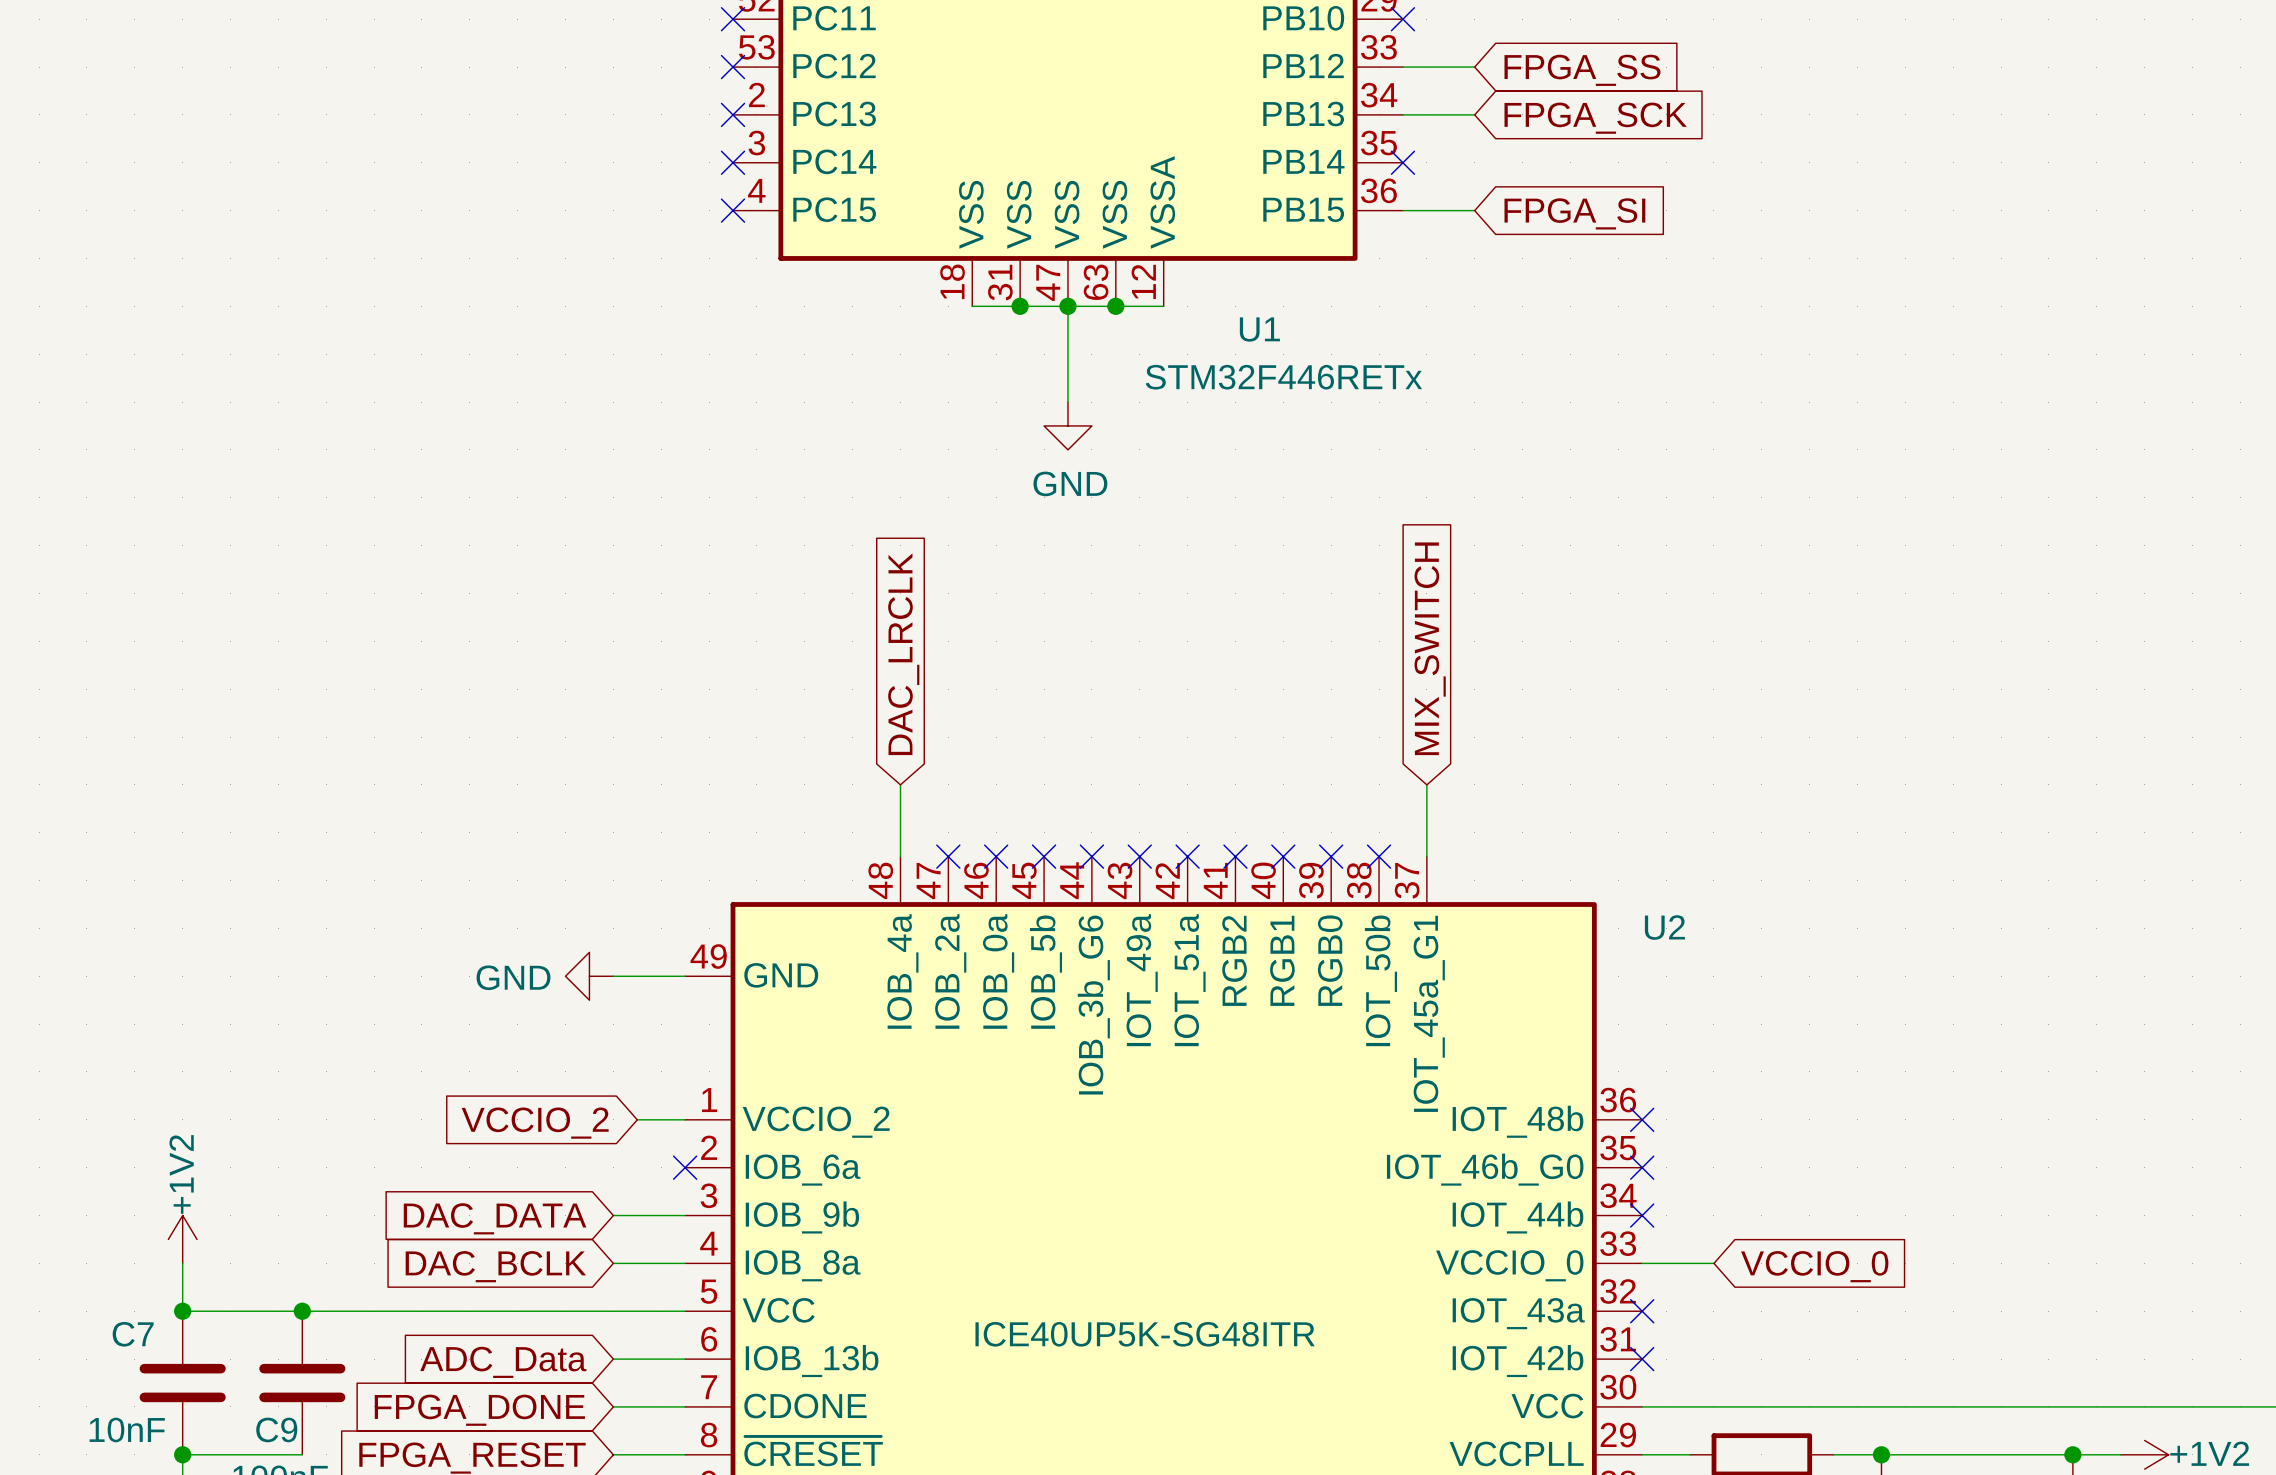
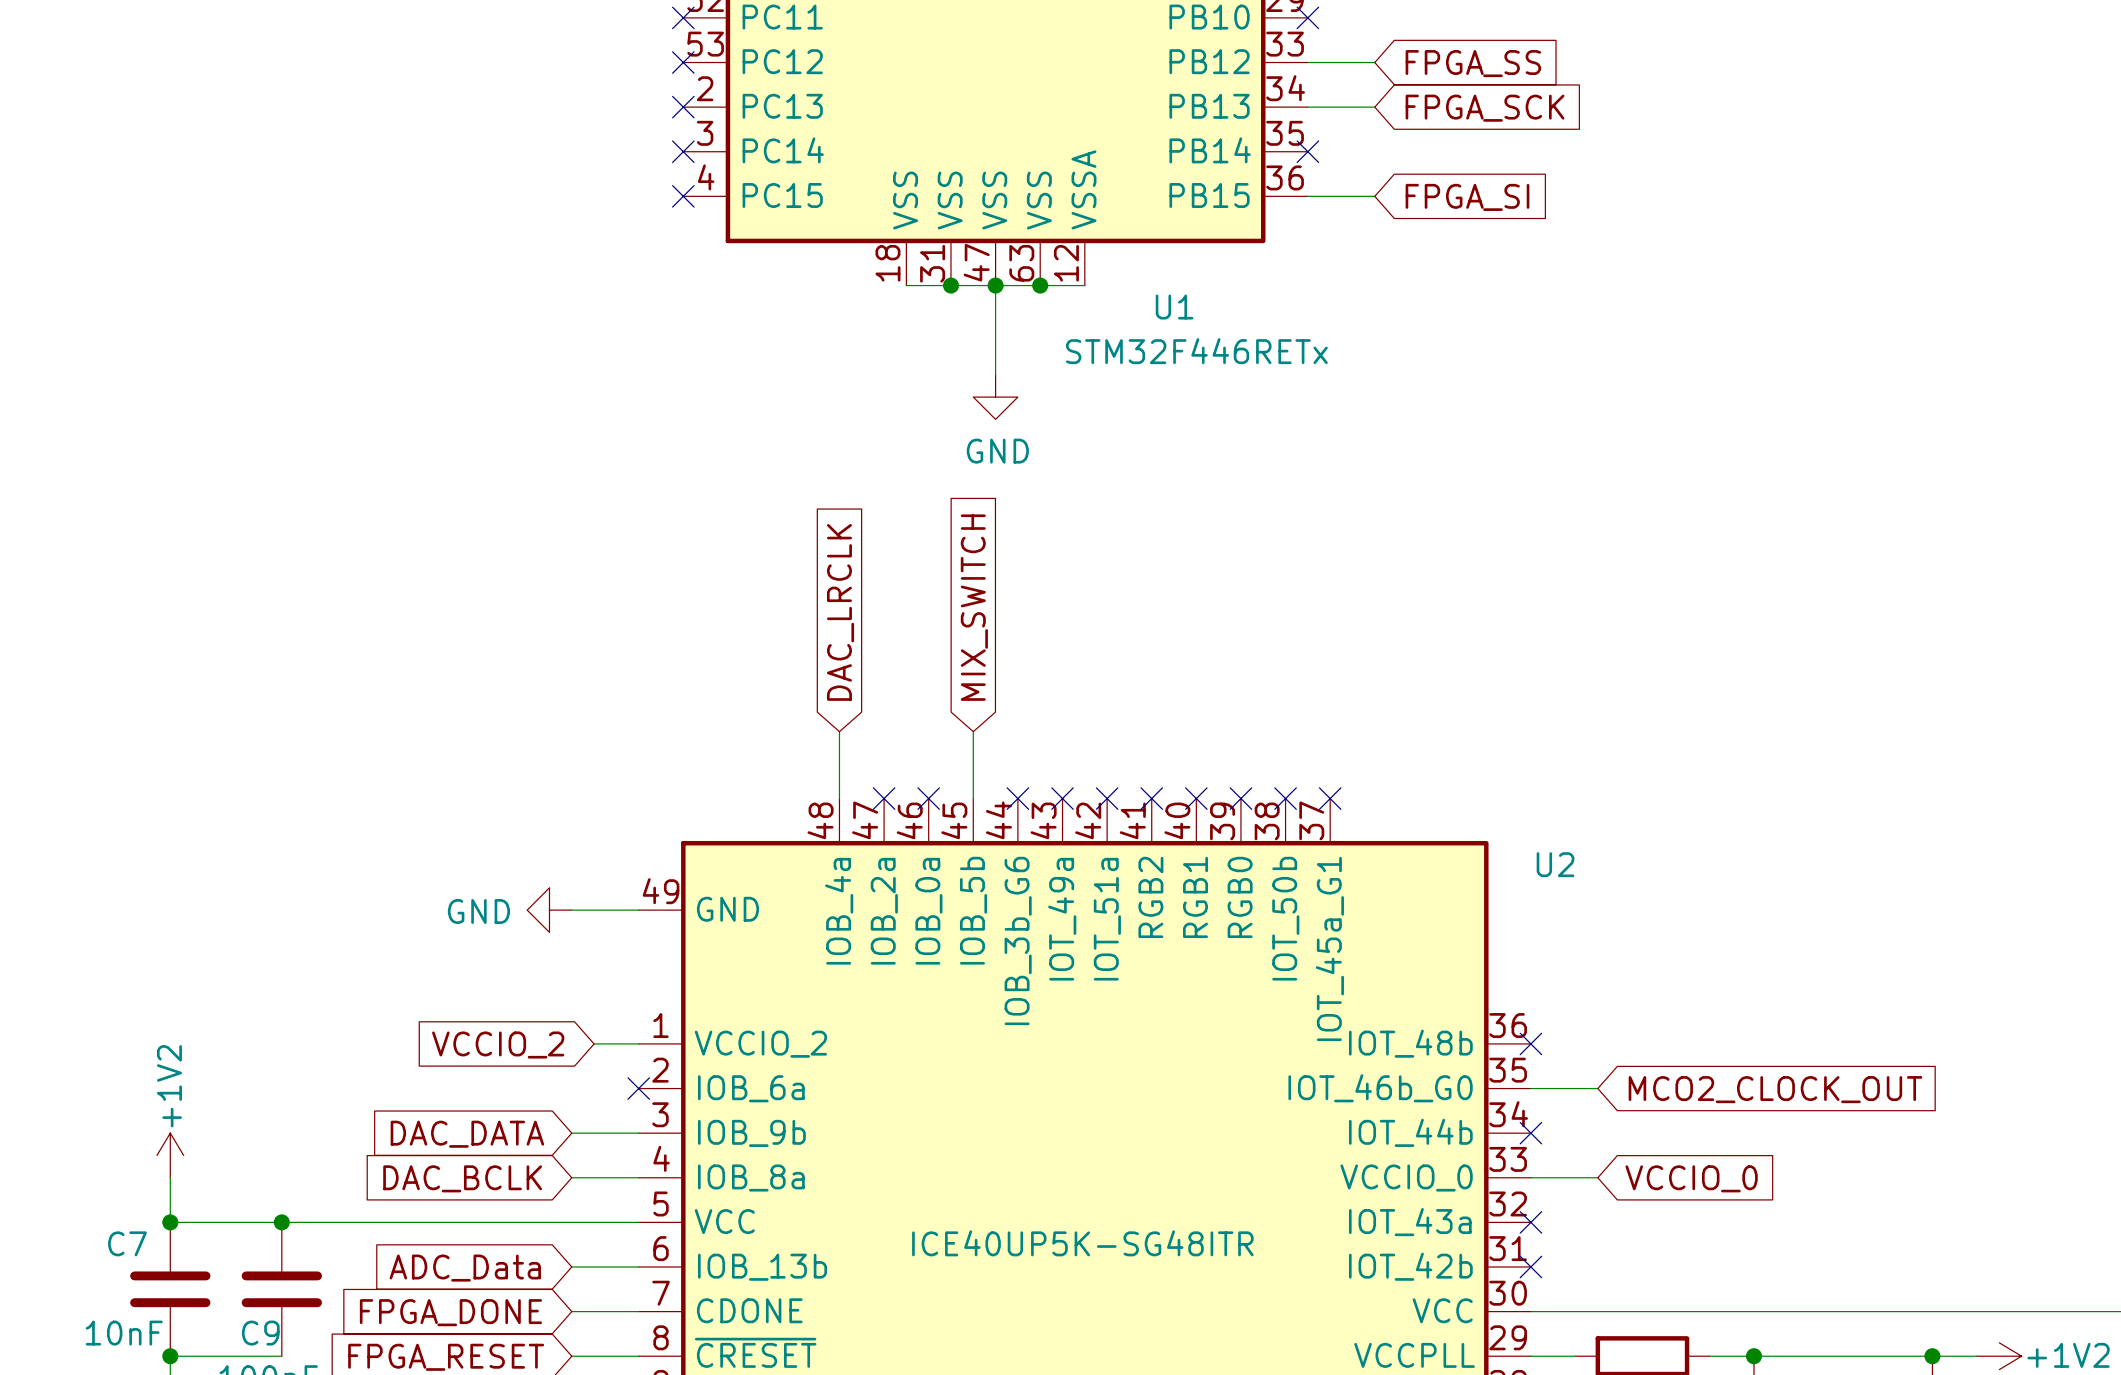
global label position: MIX_SWITCH (1430, 648) -> MIX_SWITCH (974, 607)
wire: (1426, 784) (1426, 856) -> (973, 731) (973, 798)
no-connect mark: (1044, 856) -> none
no-connect mark: none -> (1330, 798)
wire: none -> (1530, 1088) (1597, 1088)
no-connect mark: (1642, 1167) -> none
global label: none -> MCO2_CLOCK_OUT (1775, 1089)

